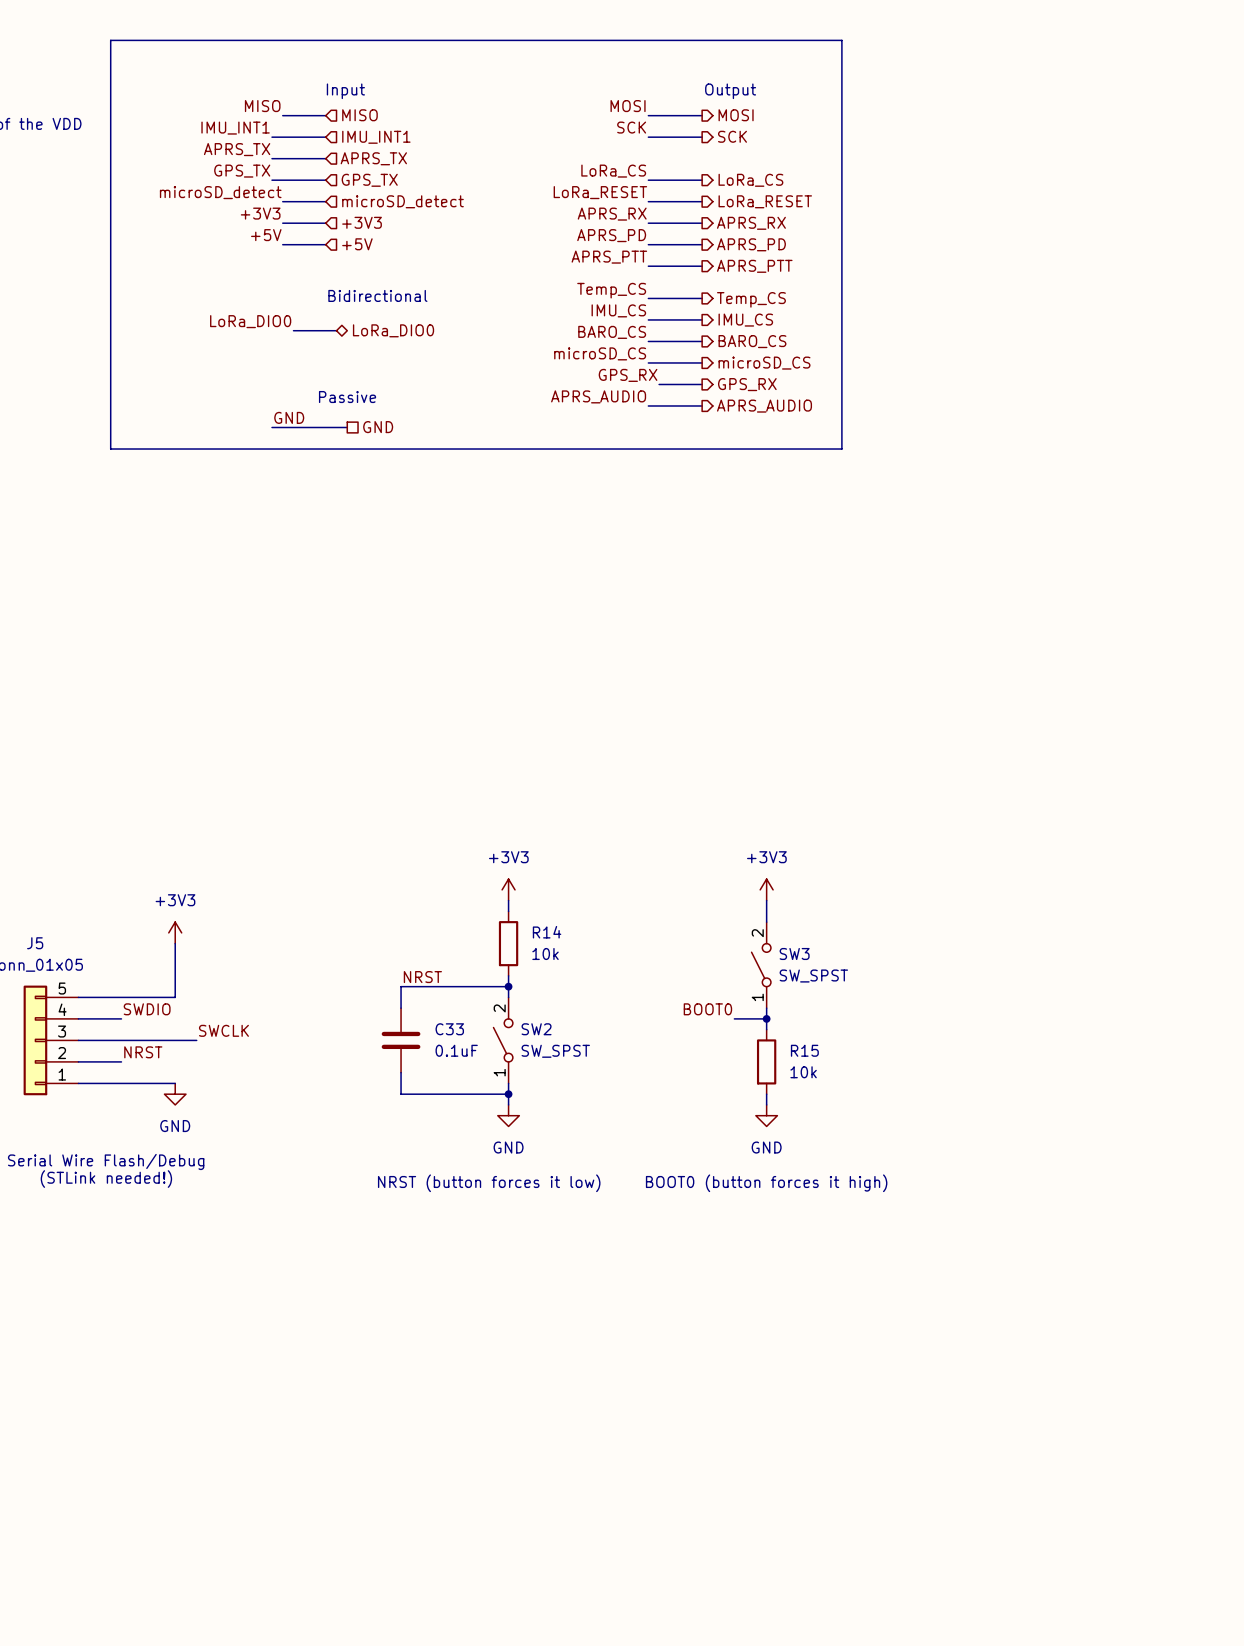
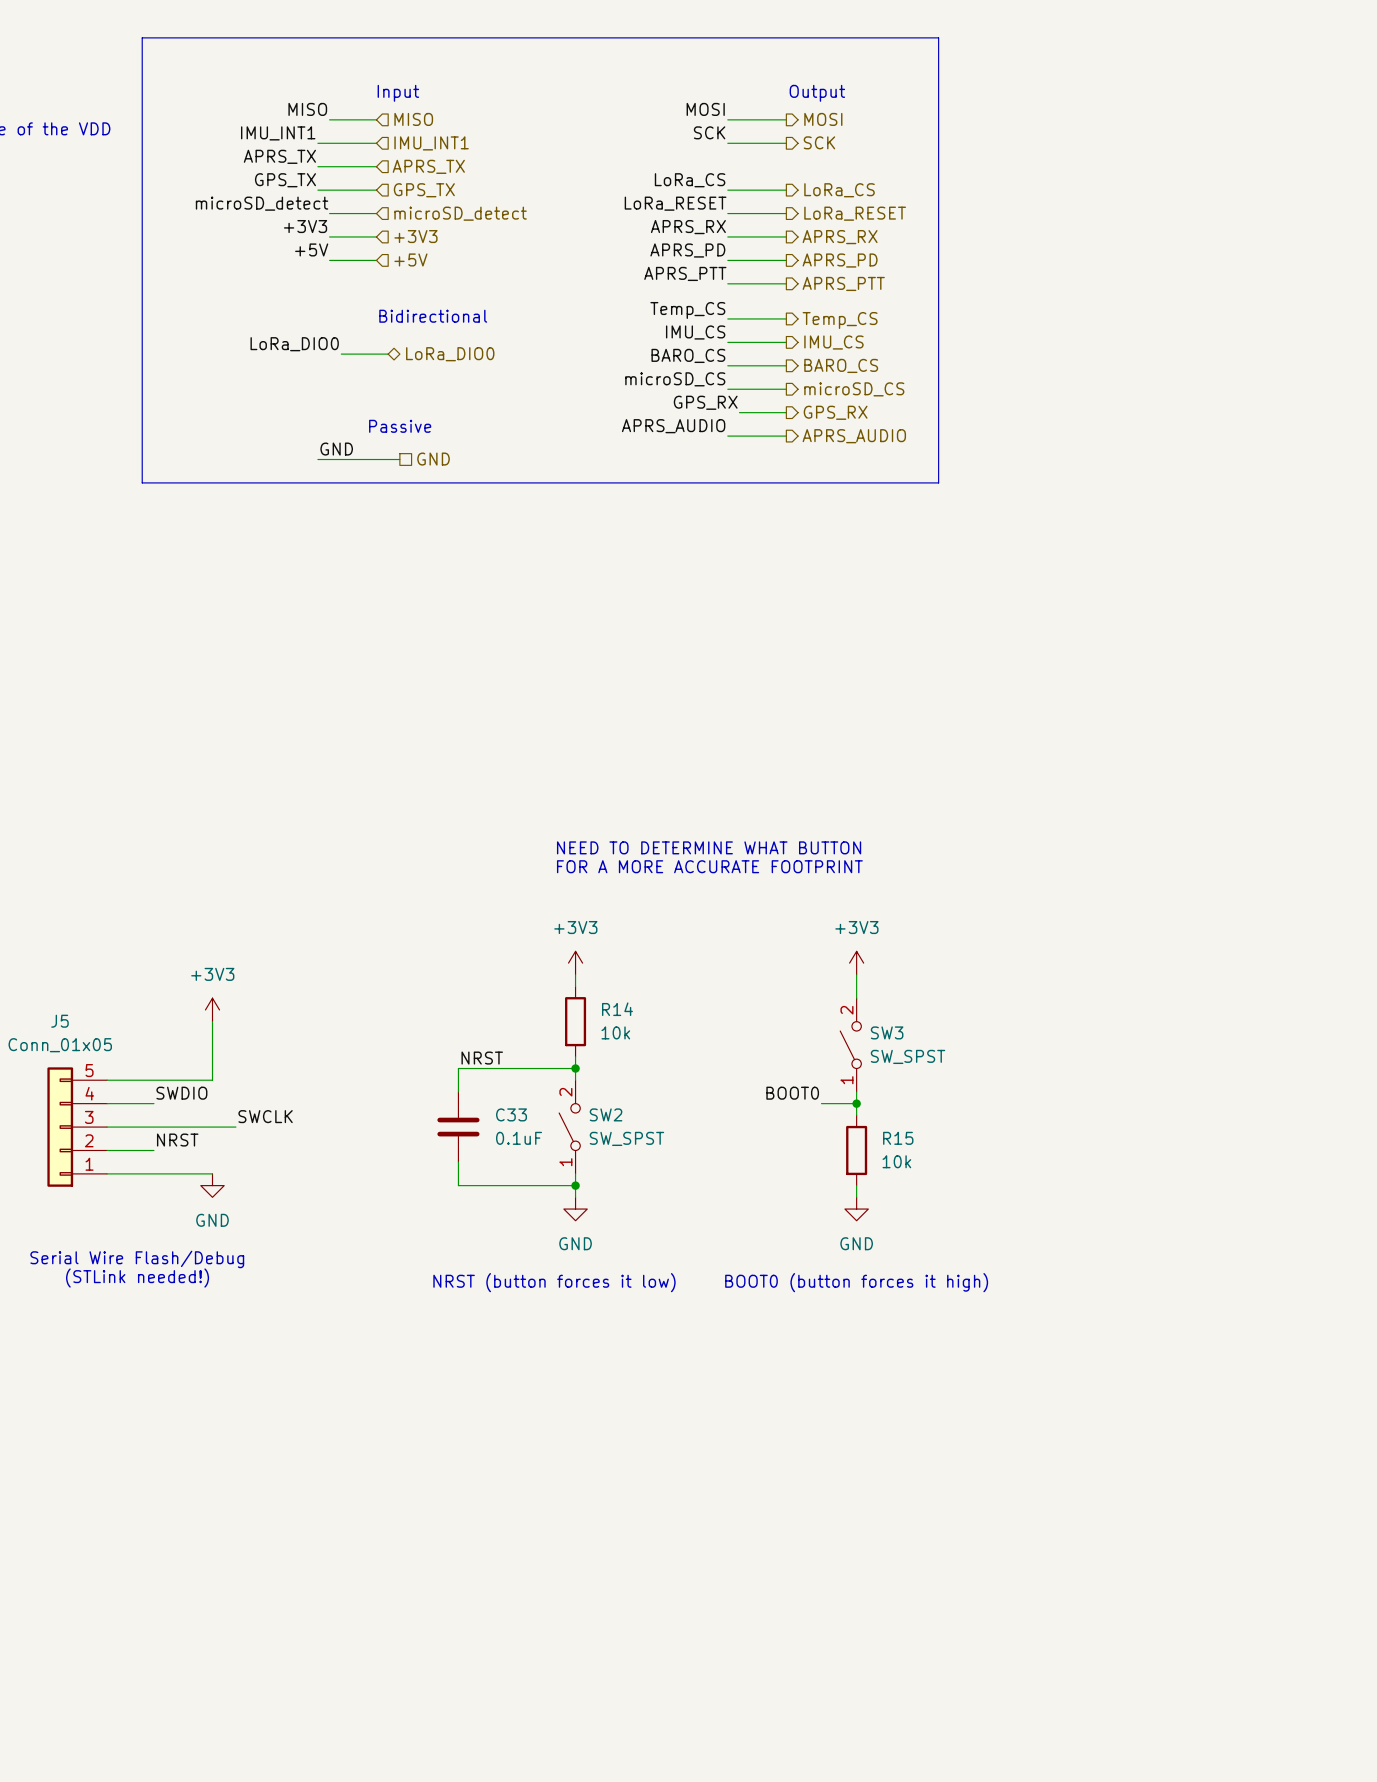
text: none -> NEED TO DETERMINE WHAT BUTTON (709, 847)
text: none -> FOR A MORE ACCURATE FOOTPRINT (709, 866)

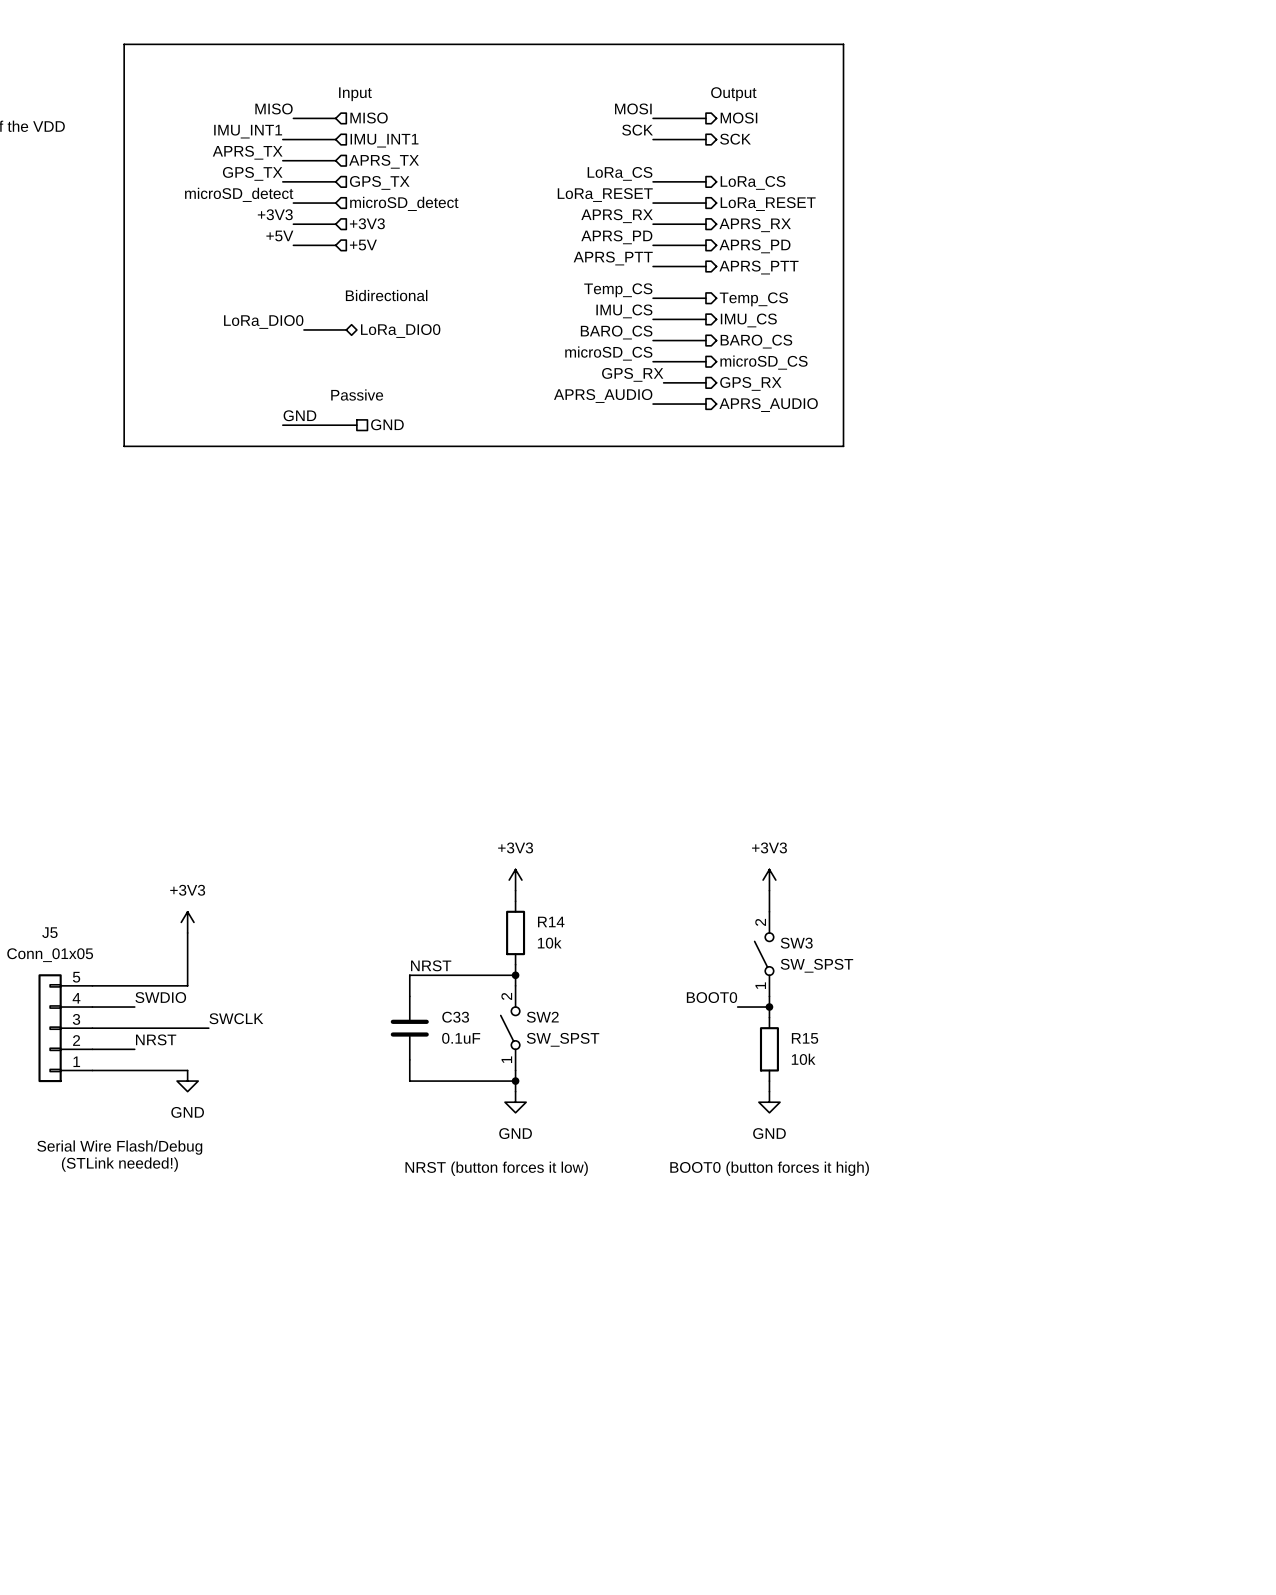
text: NEED TO DETERMINE WHAT BUTTON (709, 847) -> none
text: FOR A MORE ACCURATE FOOTPRINT (709, 866) -> none

